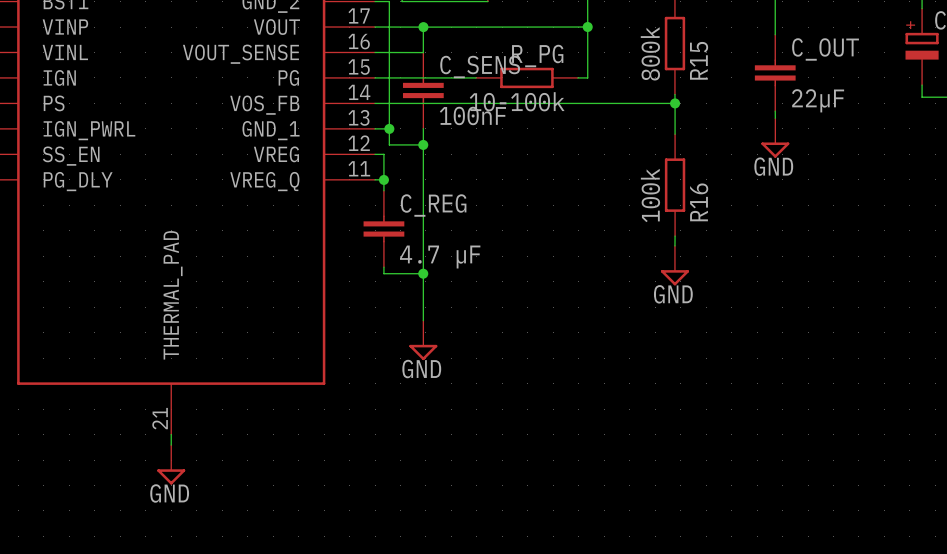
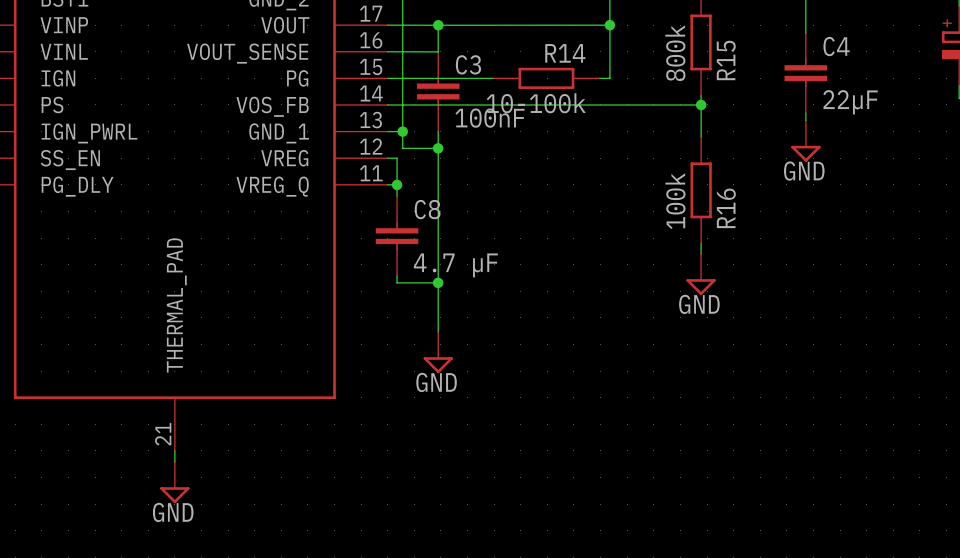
C_OUT name: C_OUT (825, 49) -> C4 (836, 46)
R_PG name: R_PG (537, 56) -> R14 (565, 53)
C_SENS name: C_SENS (480, 67) -> C3 (468, 64)
C_REG name: C_REG (433, 205) -> C8 (427, 209)

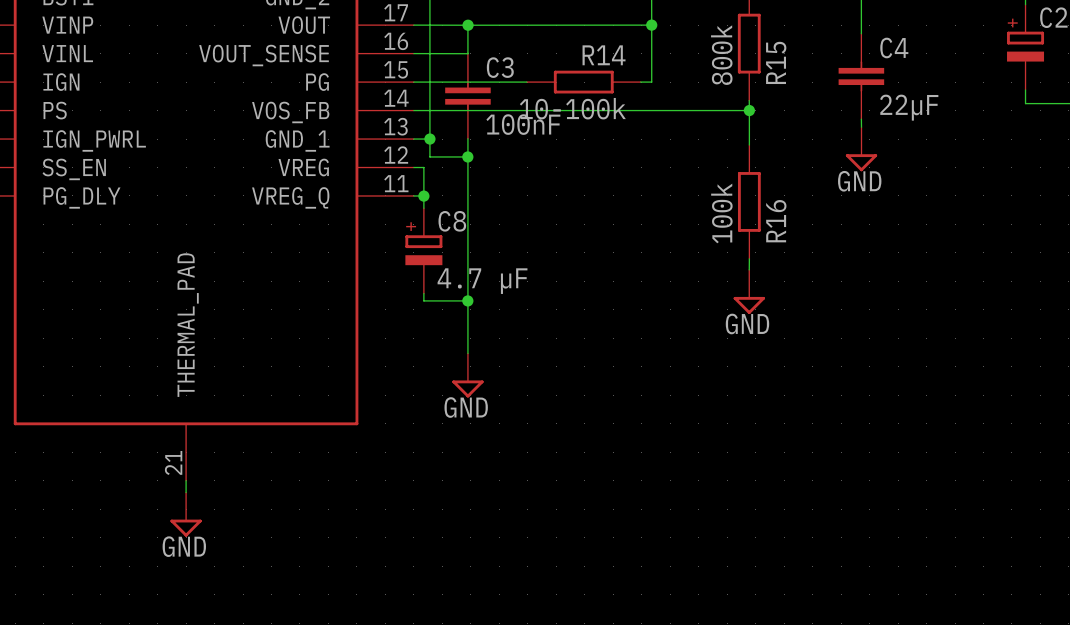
C8 symbol: [375, 196, 419, 277] -> [405, 208, 443, 294]

